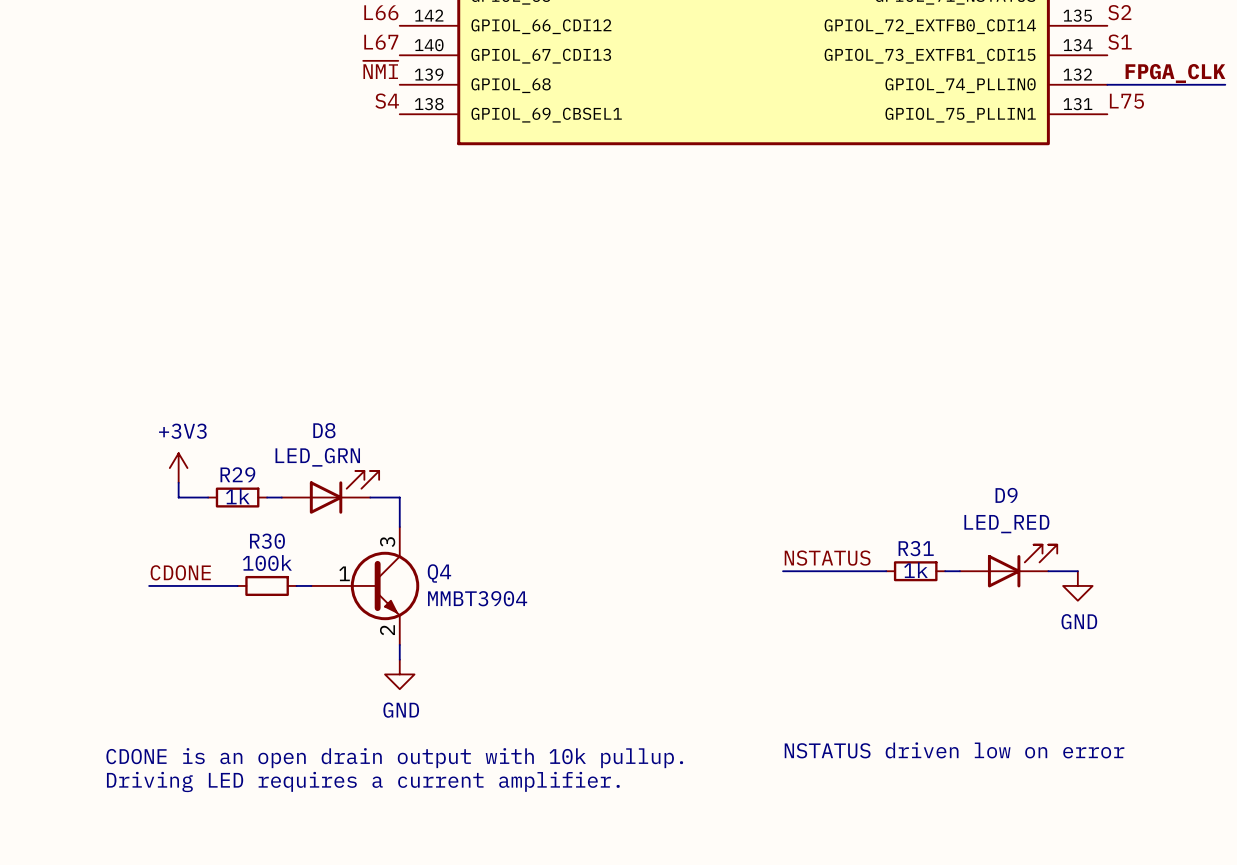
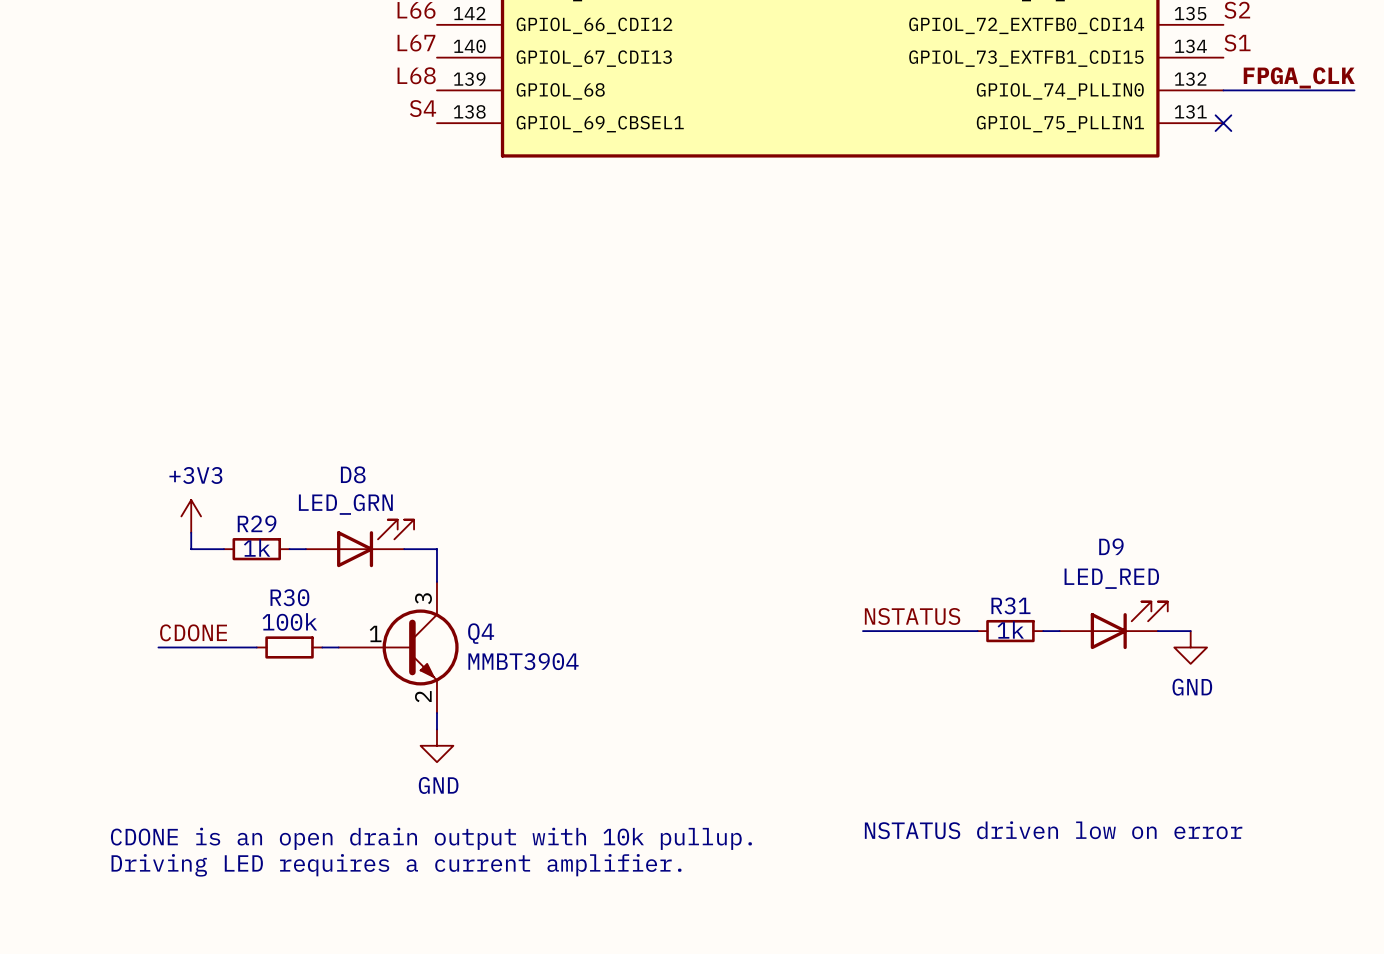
label: ~{NMI} (380, 69) -> L68 (416, 75)
label: L75 (1126, 101) -> none
no-connect mark: none -> (1223, 123)

